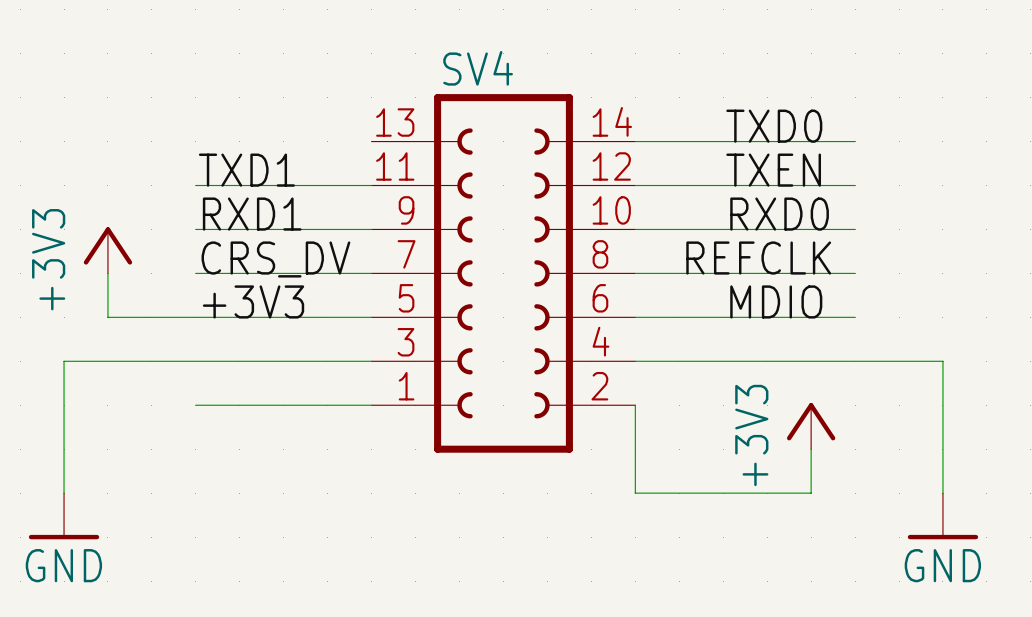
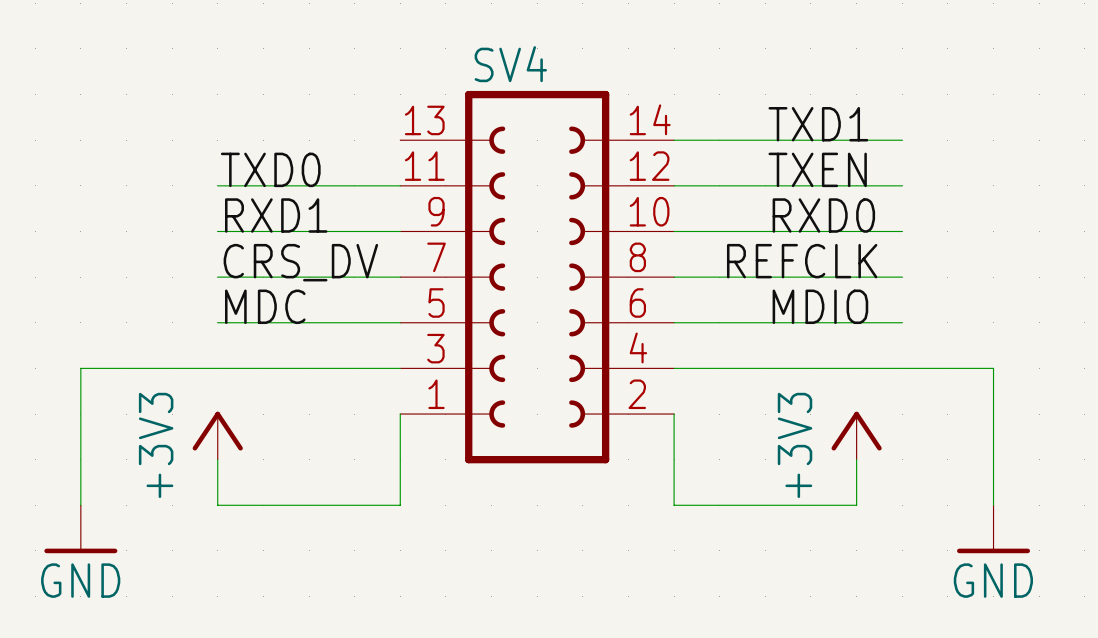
label: TXD0 (774, 126) -> TXD1 (818, 124)
label: TXD1 (246, 170) -> TXD0 (270, 169)
power symbol position: +3V3 (107, 250) -> +3V3 (217, 435)
wire: (107, 273) (107, 317) (195, 317) -> none
label: +3V3 (253, 301) -> MDC (265, 306)
wire: (195, 405) (371, 405) -> (217, 459) (217, 505) (400, 505) (400, 414)

